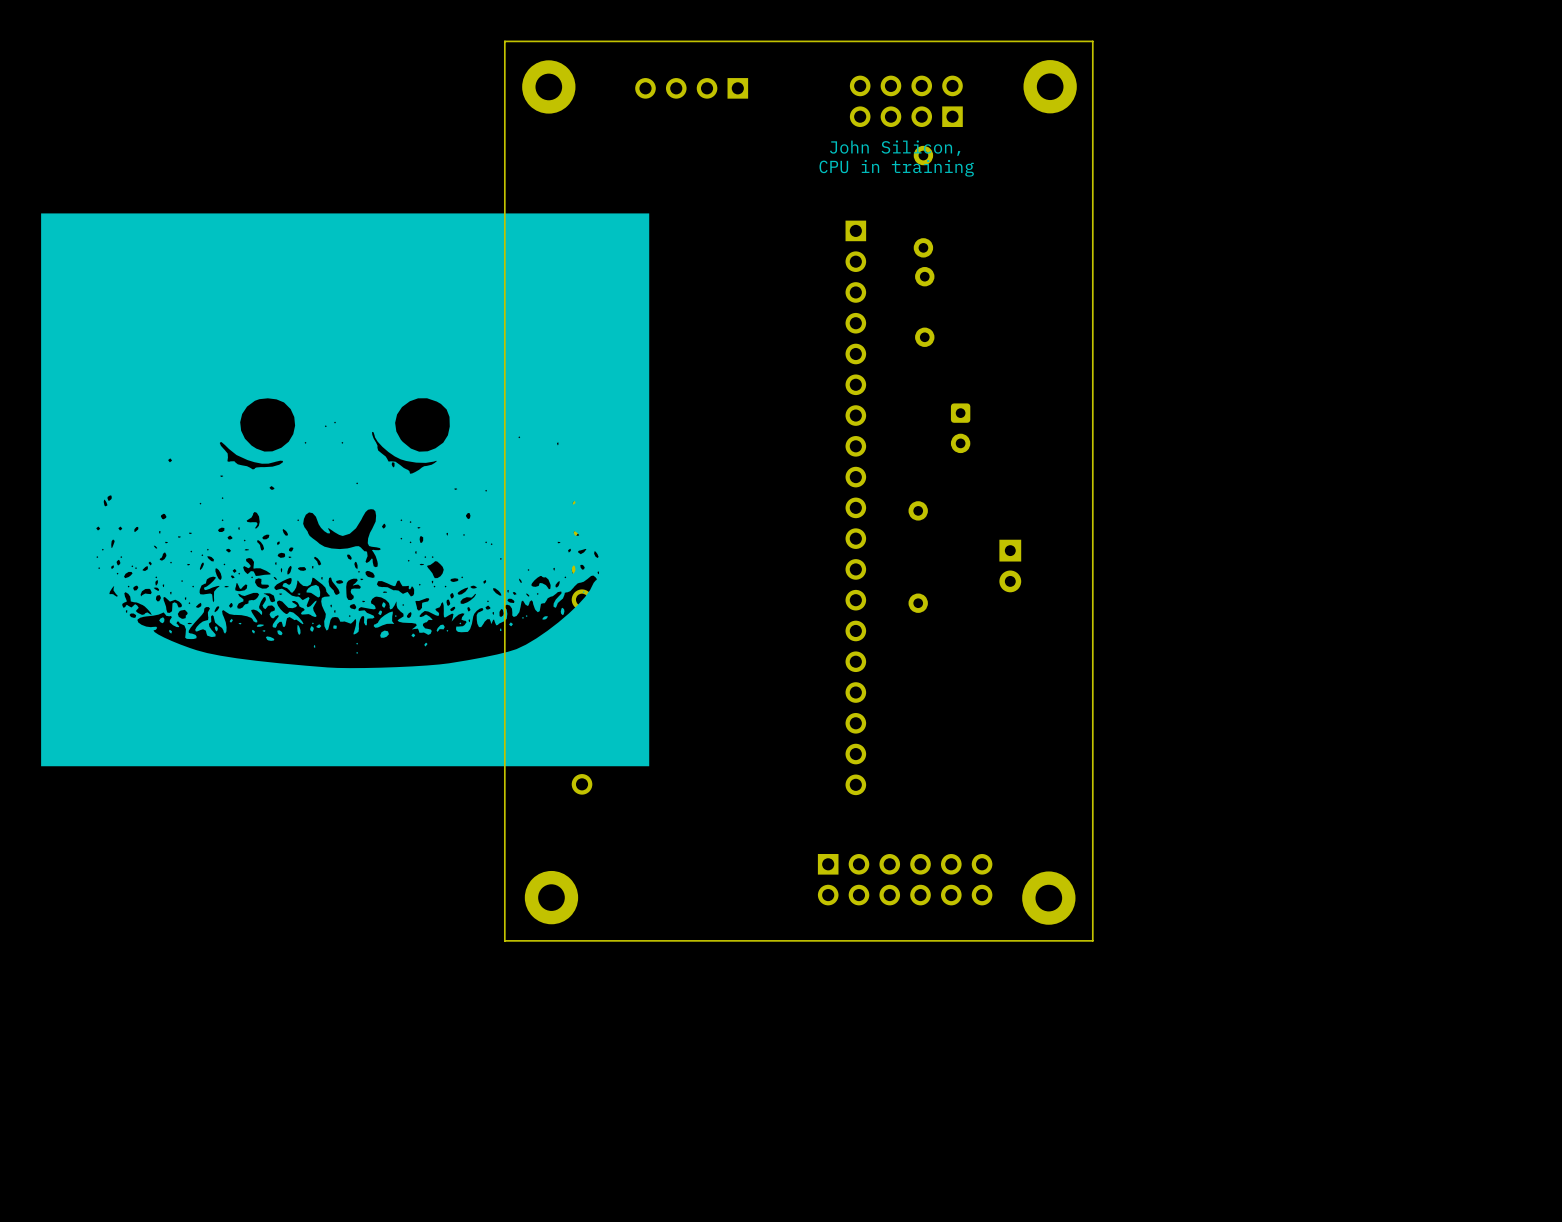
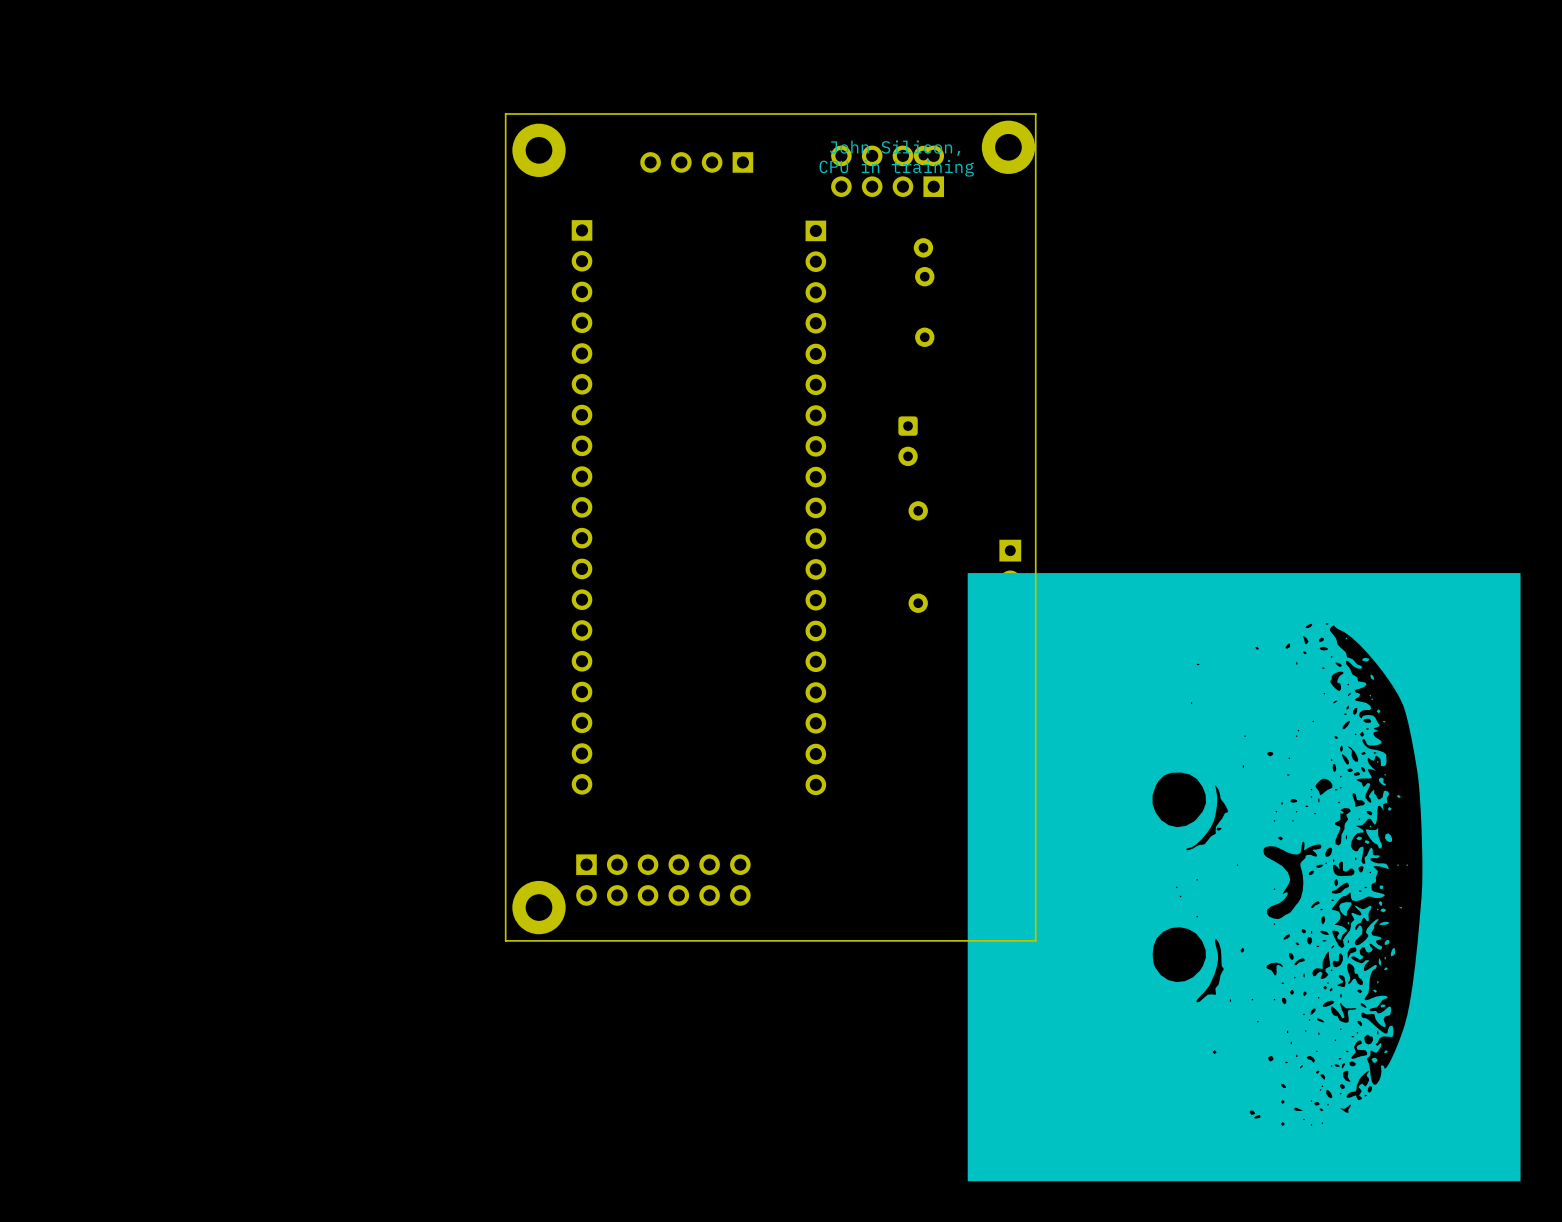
part position: (548, 86) -> (538, 150)
part position: (1050, 86) -> (1008, 147)
part position: (691, 88) -> (696, 162)
part position: (906, 101) -> (887, 171)
part position: (960, 428) -> (908, 441)
part: (345, 489) -> none
part position: (855, 507) -> (815, 507)
part: none -> (1244, 877)
part position: (905, 879) -> (663, 880)
part position: (551, 897) -> (538, 907)
board edge: (1035, 940) (1092, 940) (1092, 41) (504, 41) (505, 940) -> (1035, 940) (1035, 113) (505, 113) (505, 940)

